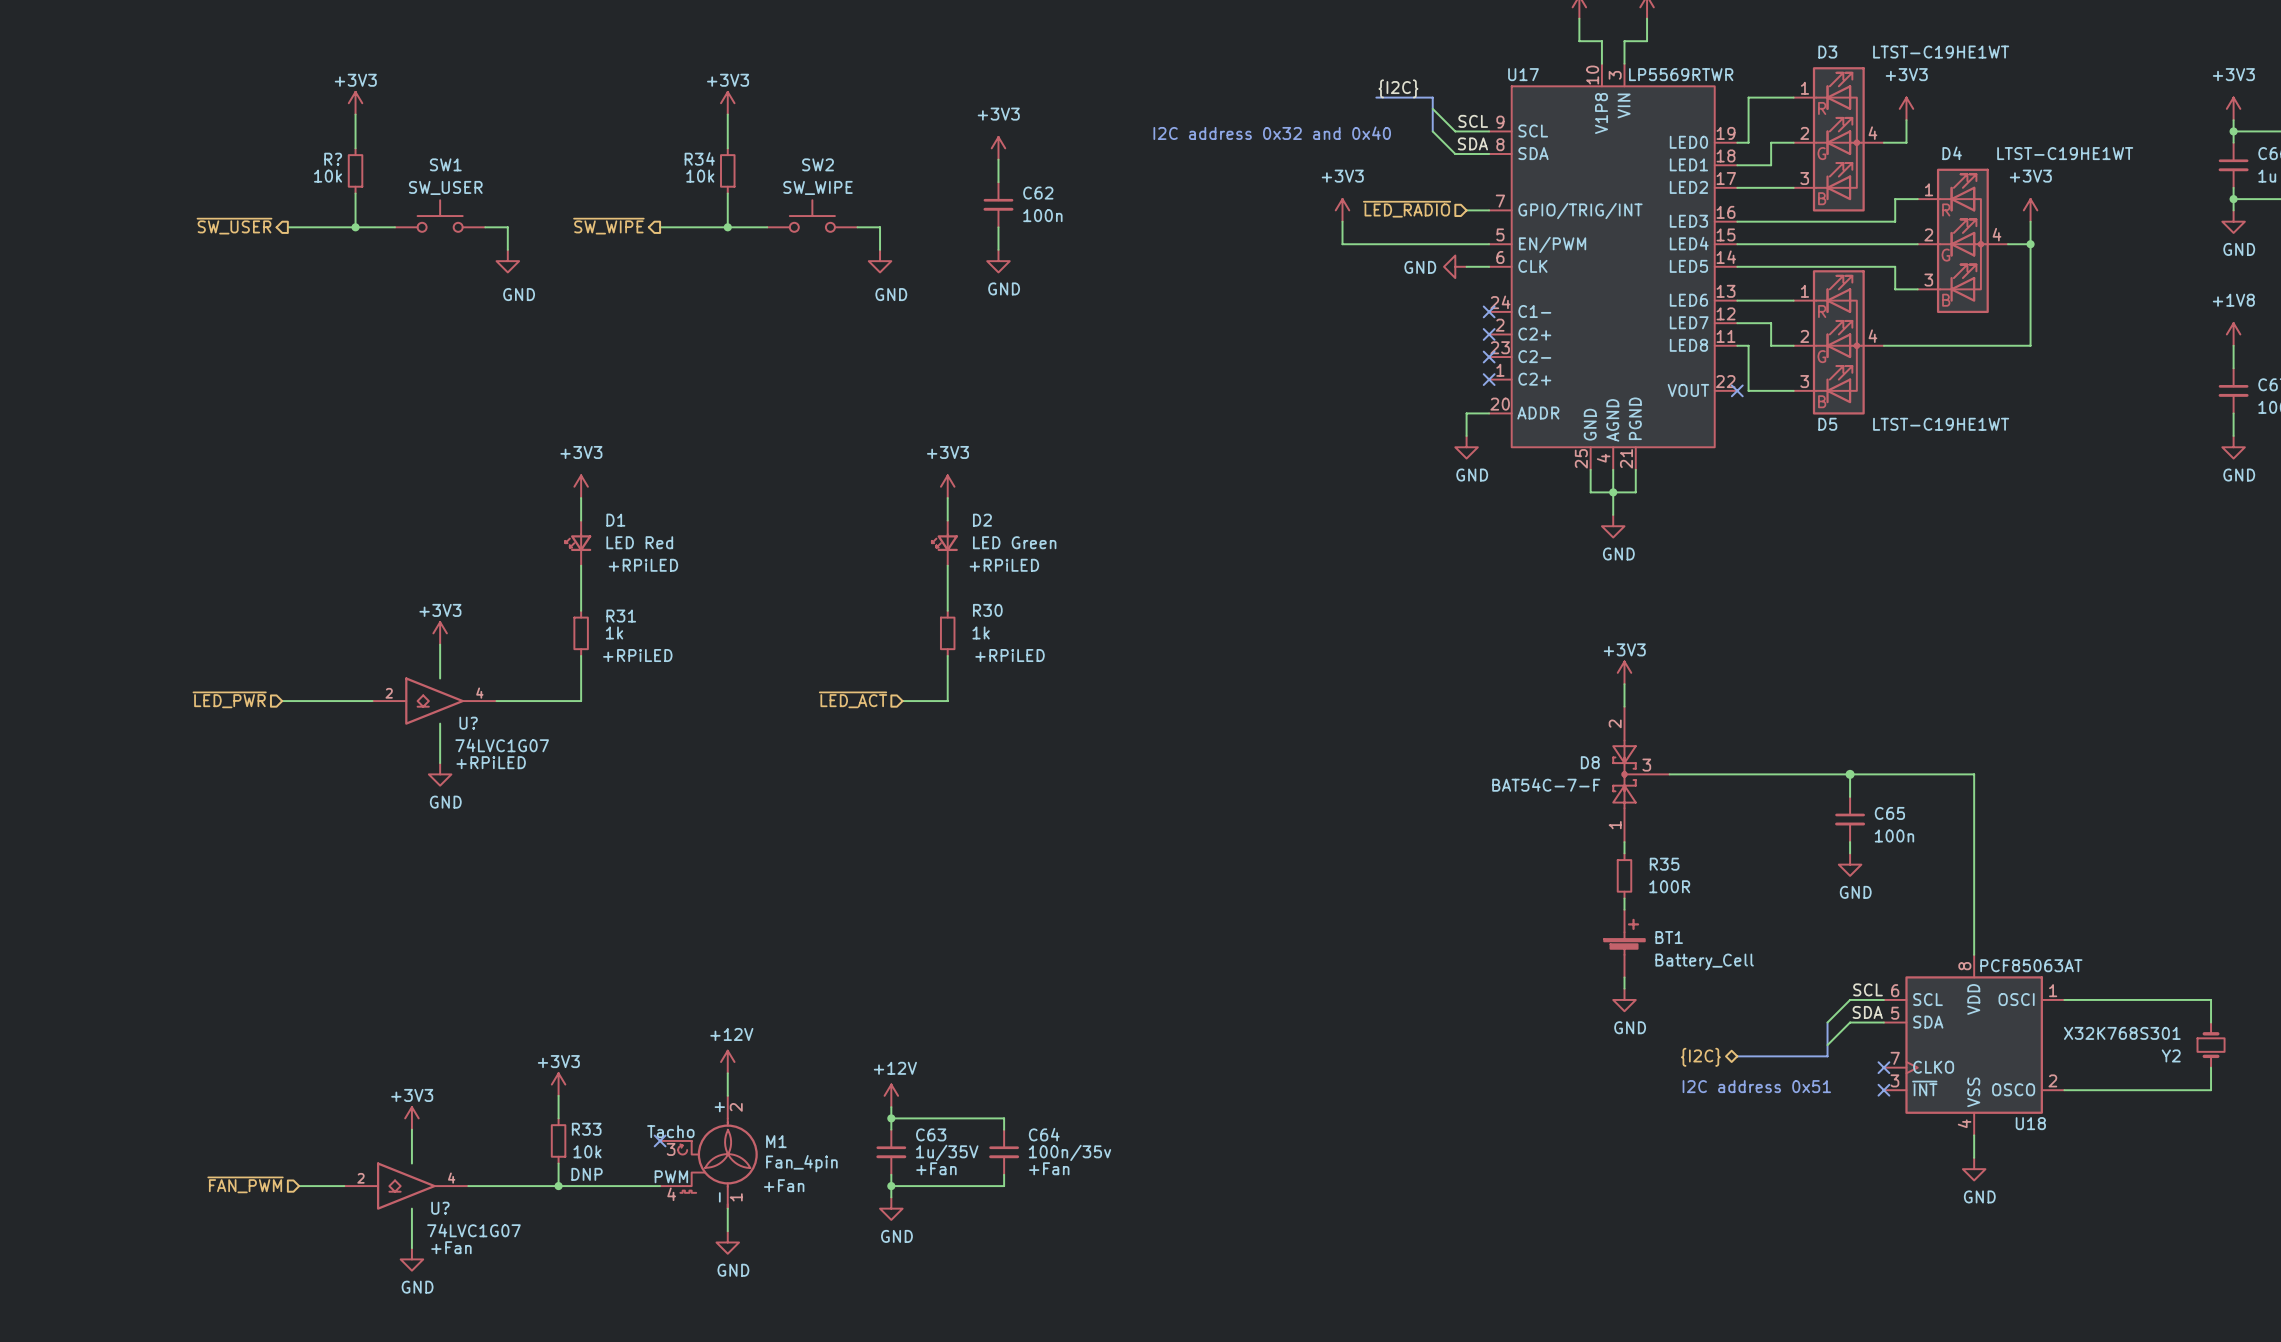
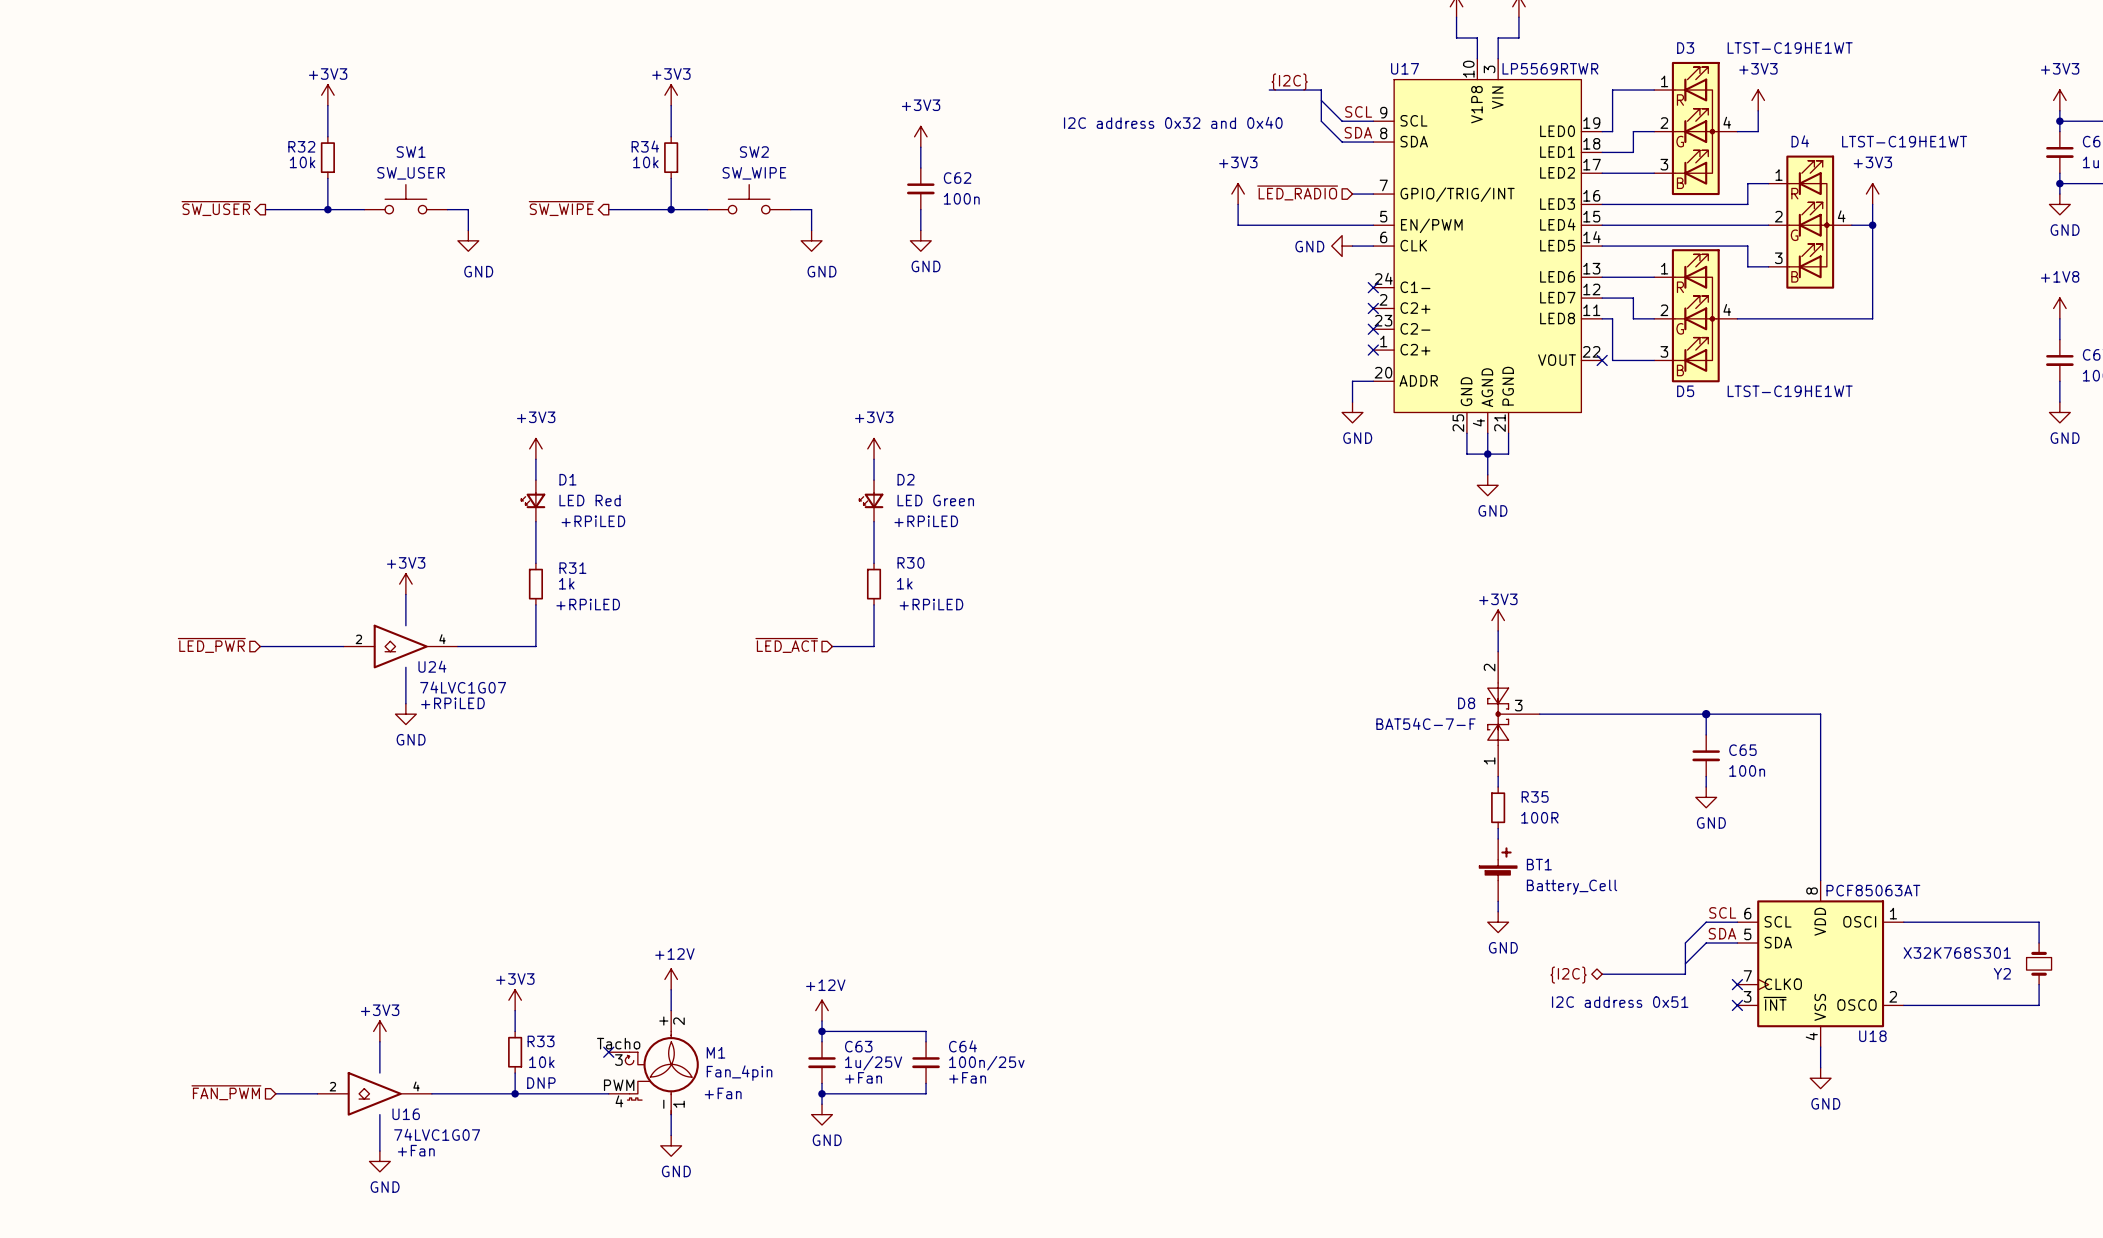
R? name: R? (333, 159) -> R32 (301, 146)
U? name: U? (468, 723) -> U24 (432, 666)
C63 value: 1u/35V (947, 1152) -> 1u/25V (873, 1063)
C64 value: 100n/35v (1070, 1152) -> 100n/25v (986, 1063)
U? name: U? (440, 1208) -> U16 (406, 1114)

